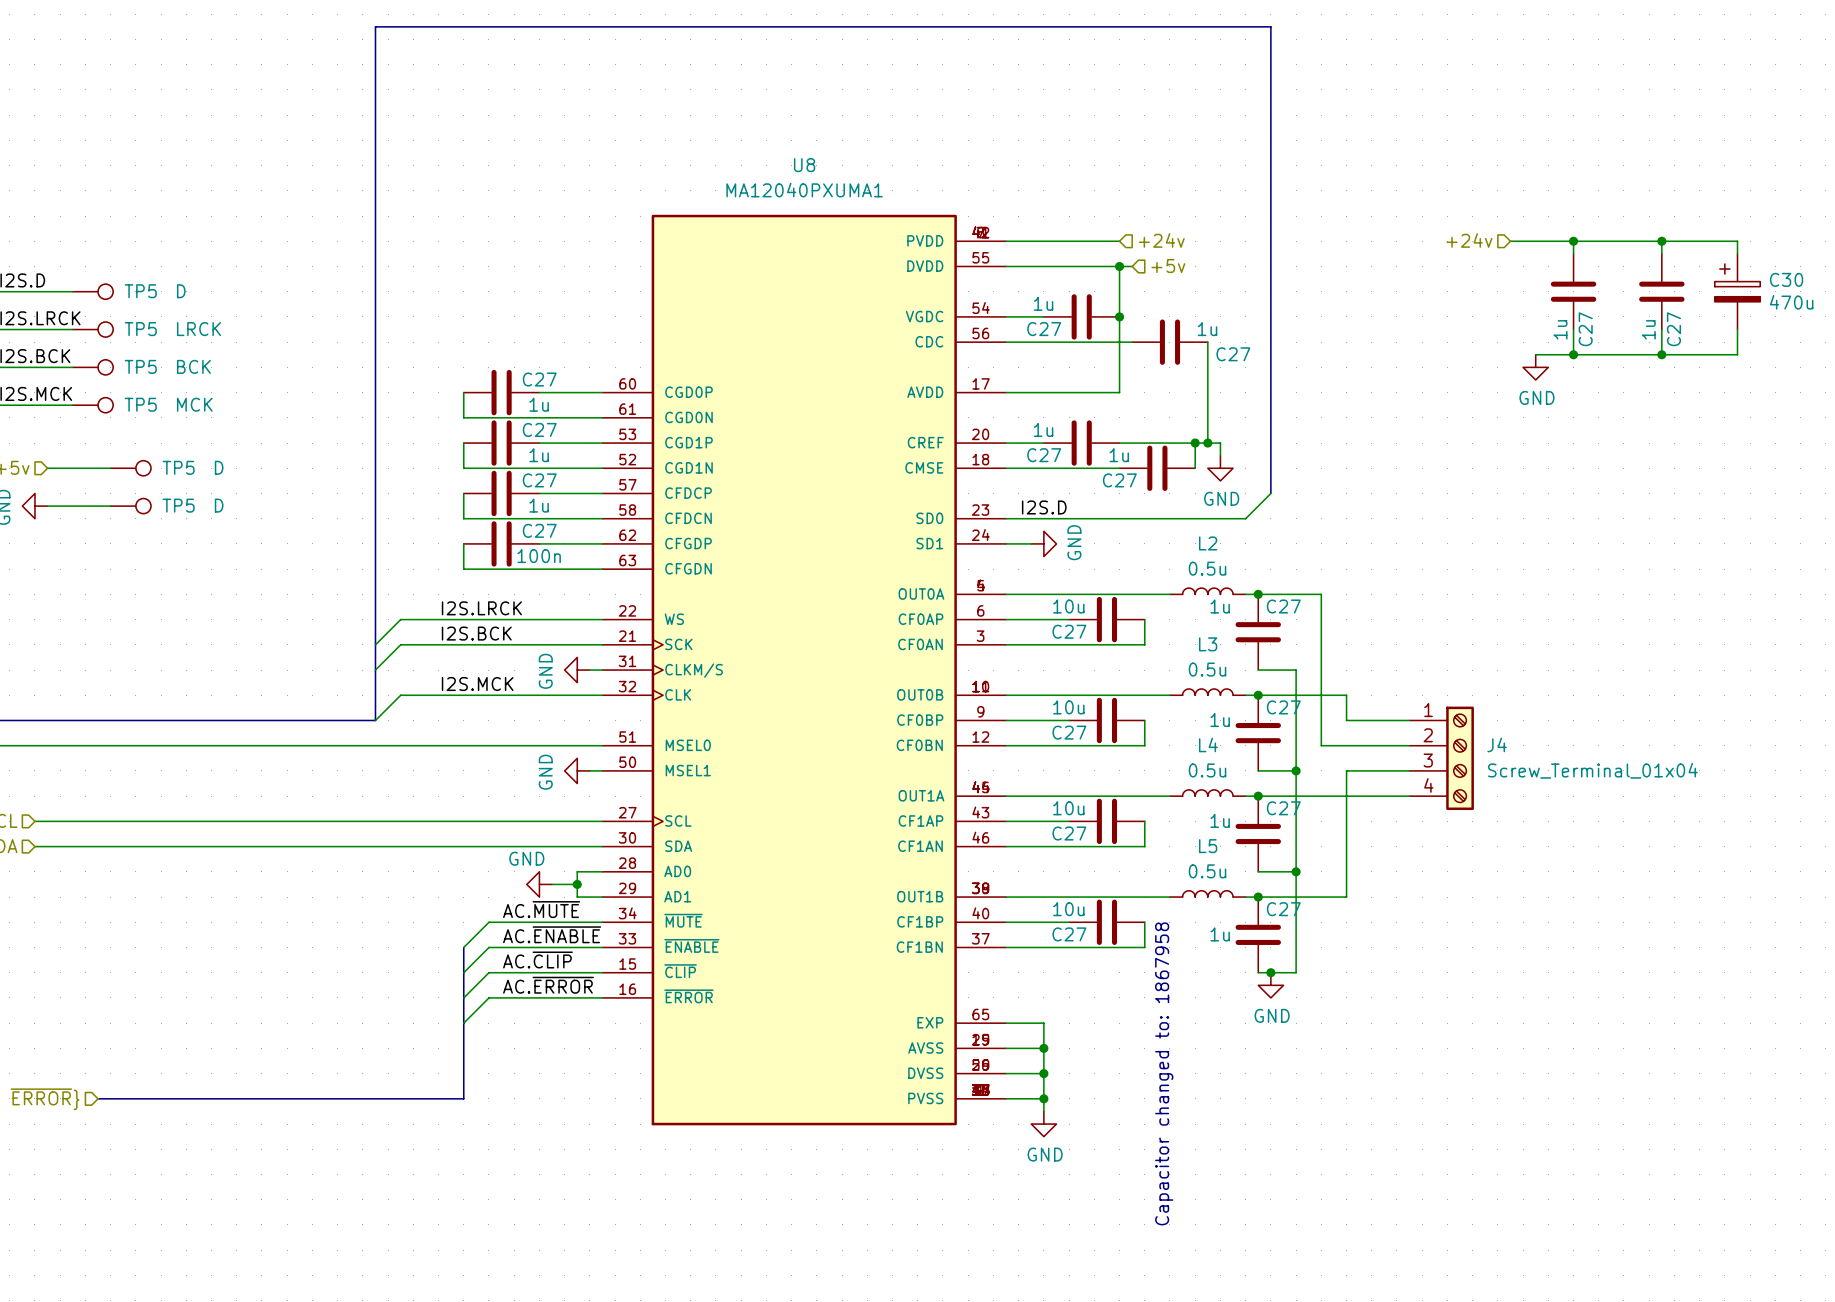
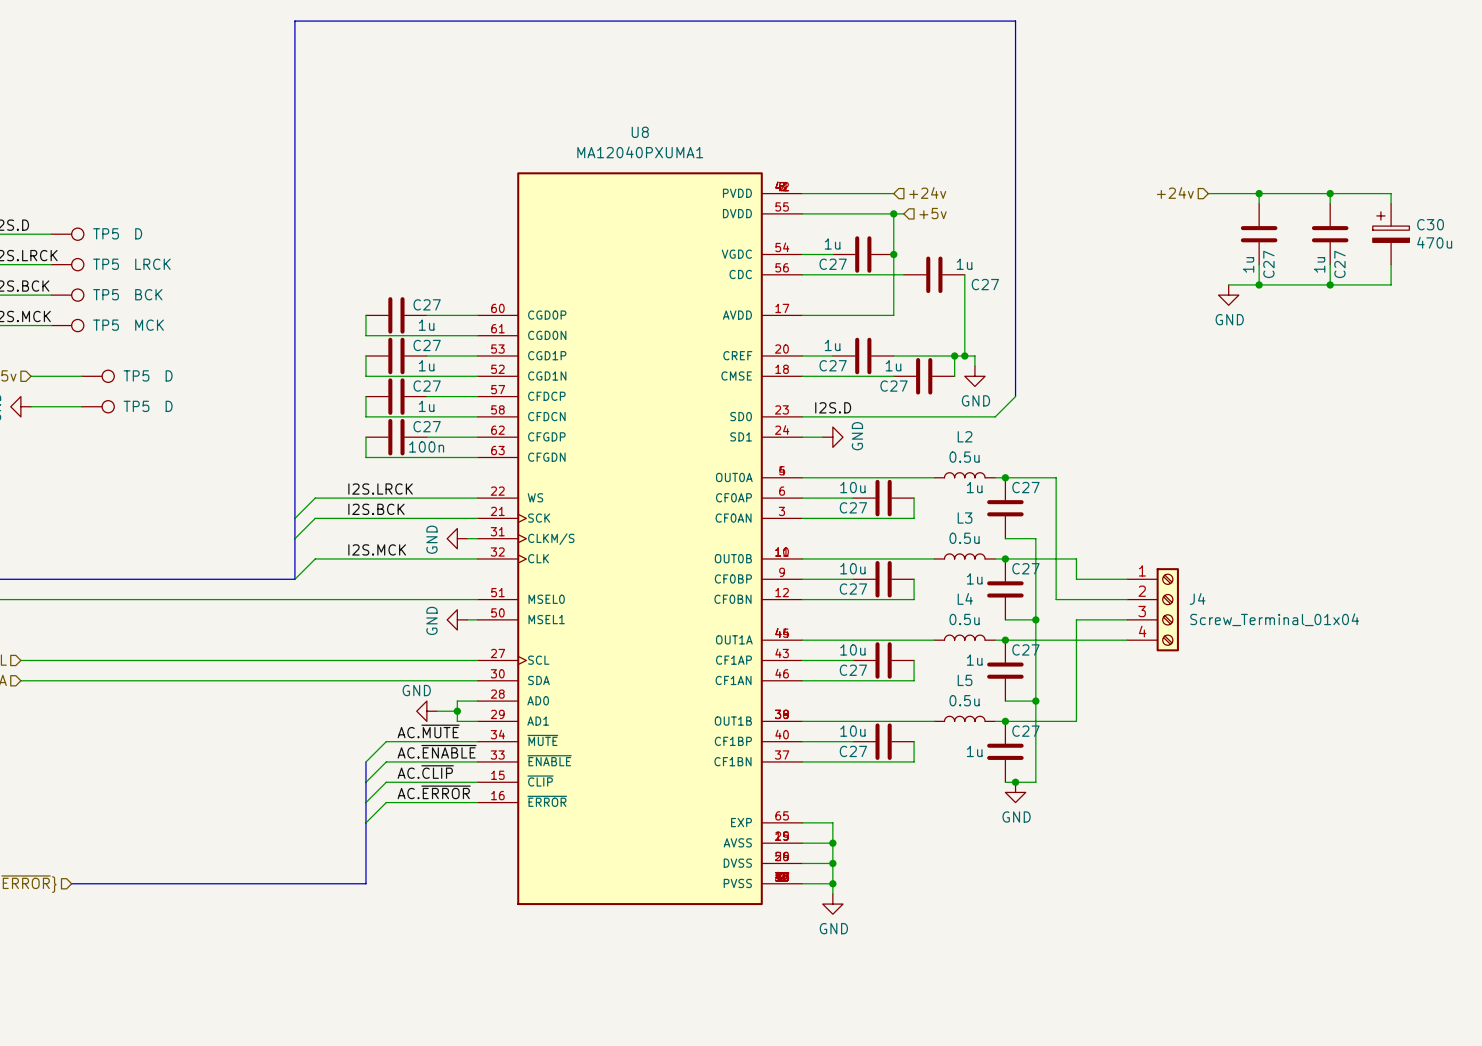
text: Capacitor changed to: 1867958 (1164, 1073) -> none

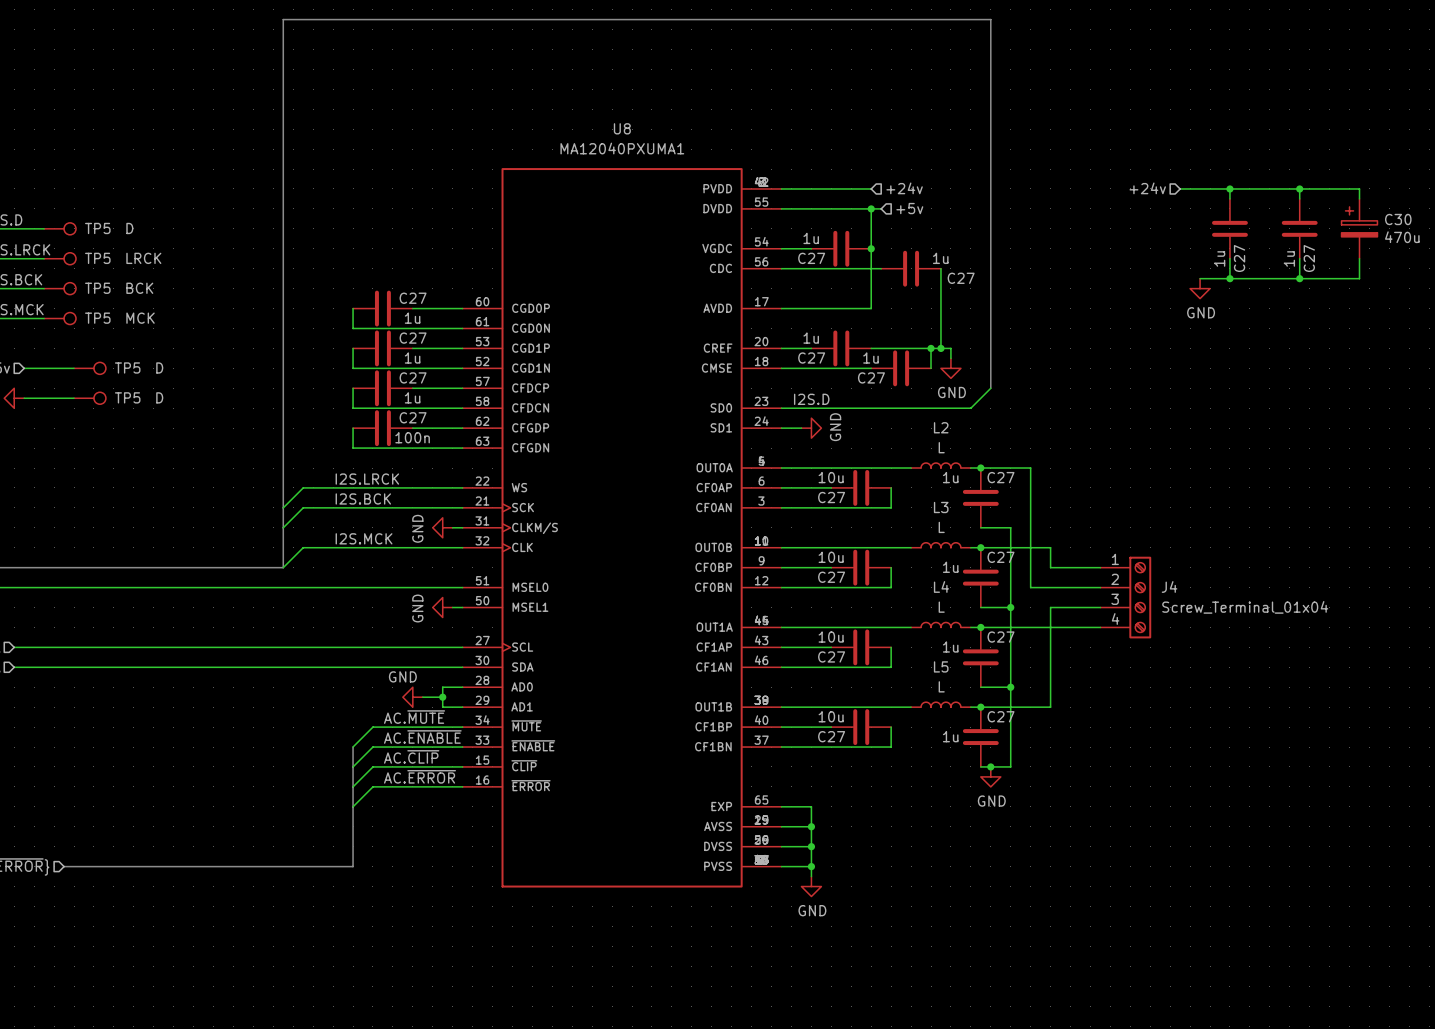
L2 value: 0.5u (964, 457) -> L (941, 447)
L3 value: 0.5u (964, 538) -> L (941, 527)
L4 value: 0.5u (964, 619) -> L (941, 607)
L5 value: 0.5u (964, 700) -> L (941, 686)

